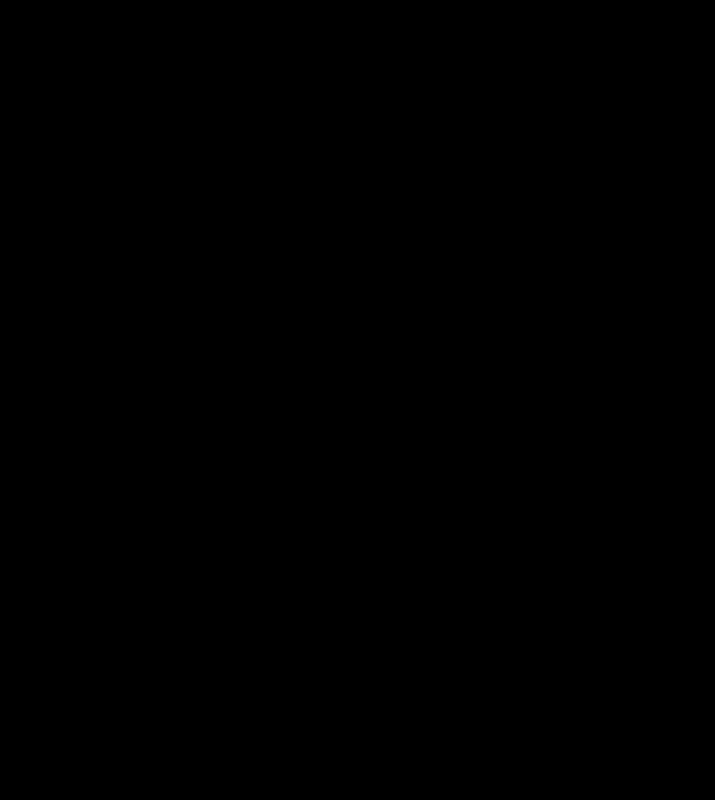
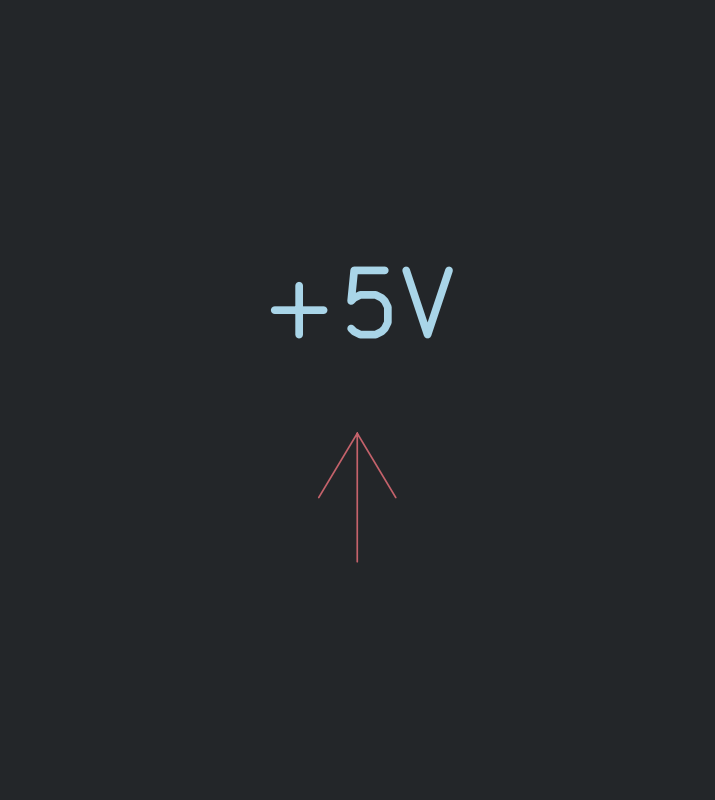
power symbol: none -> +5V (357, 497)

